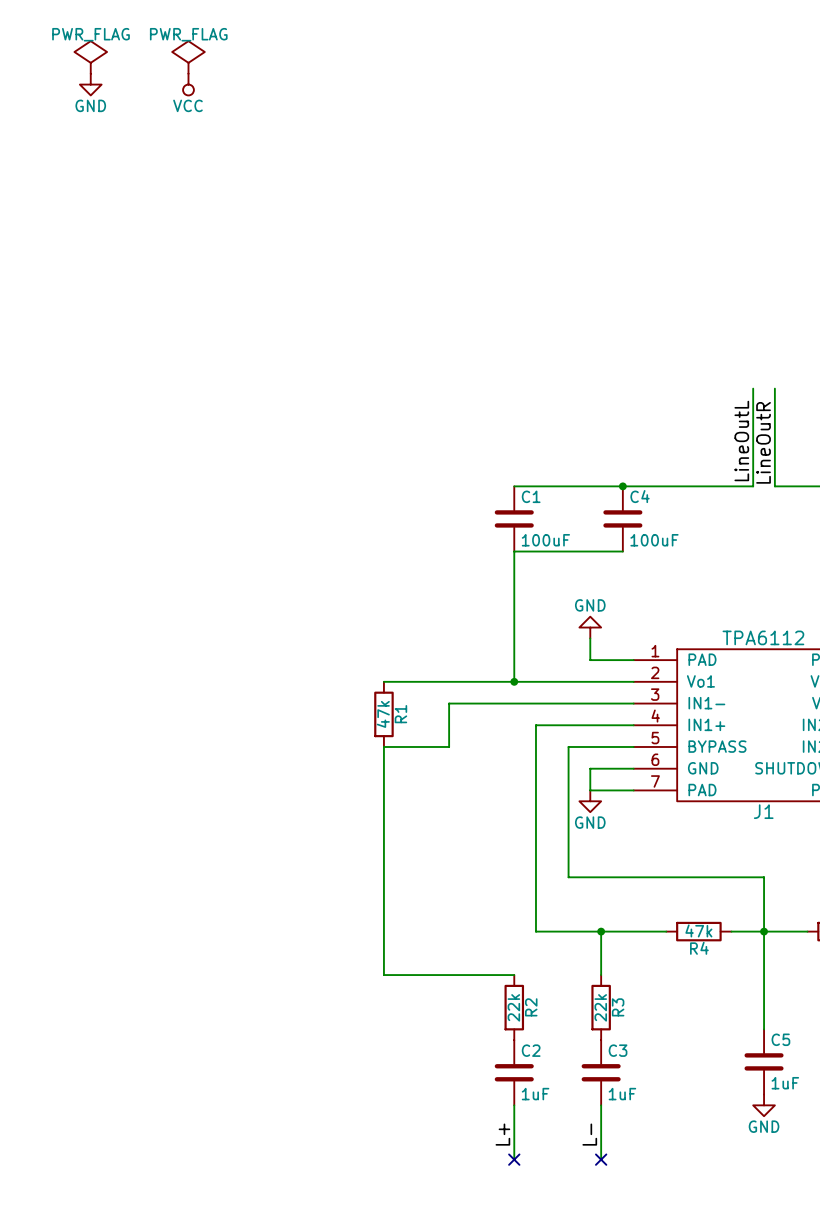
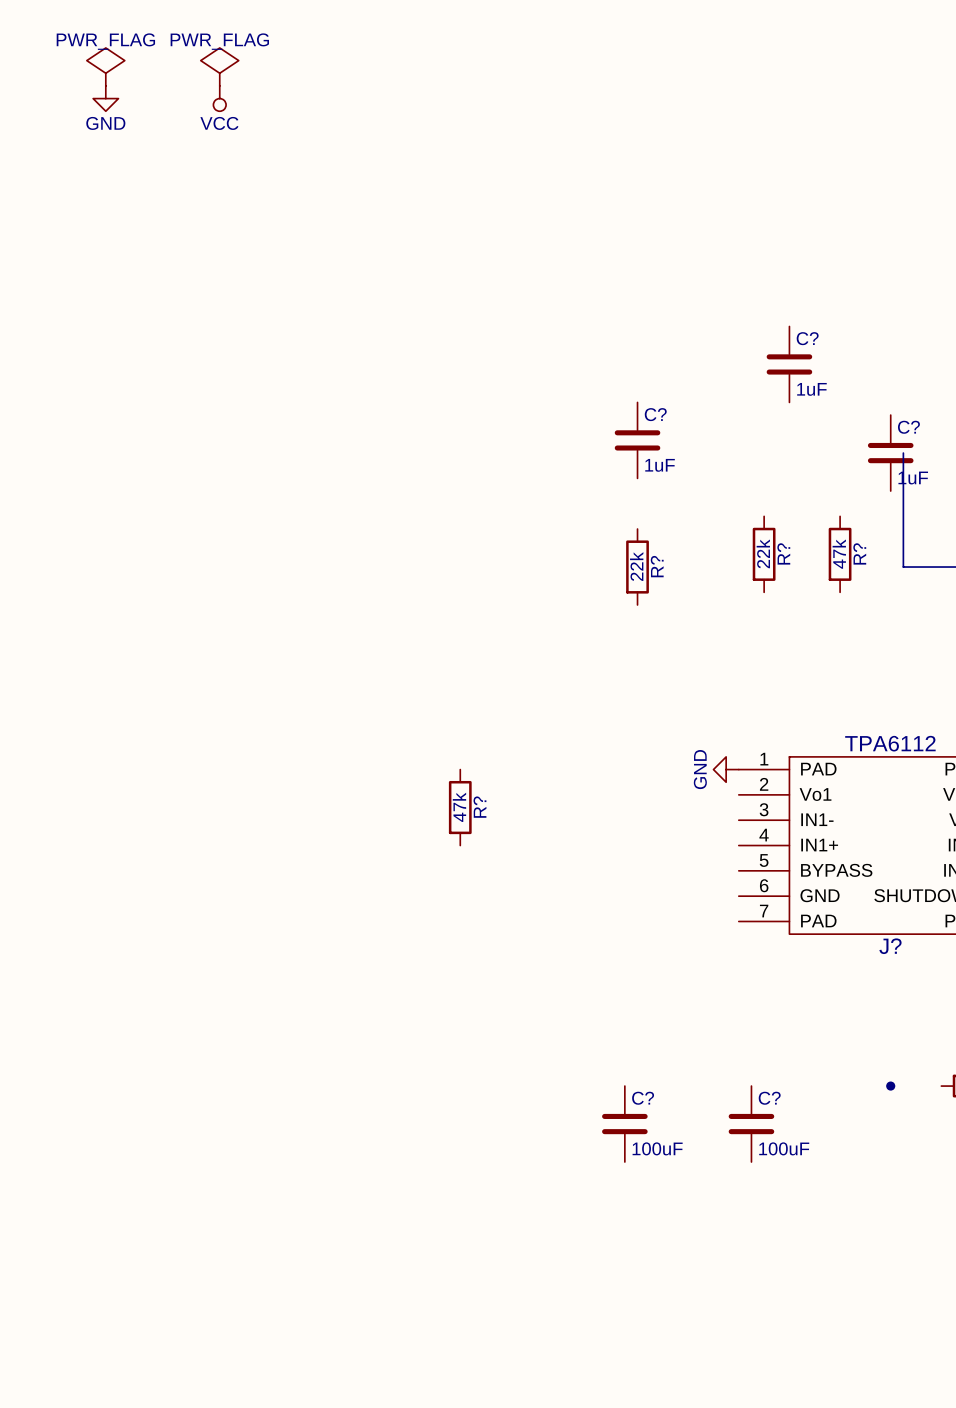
C?: none -> 1uF (789, 364)
C?: none -> 1uF (637, 440)
wire: (753, 388) (753, 486) (514, 486) -> none
C?: none -> 1uF (890, 453)
label: LineOutL (741, 440) -> none
label: LineOutR (763, 442) -> none
R?: none -> 22k (764, 554)
R?: none -> 47k (840, 554)
R?: none -> 22k (637, 567)
junction: (622, 486) -> none
C1: 100uF (514, 518) -> none
C4: 100uF (622, 518) -> none
wire: (622, 551) (514, 551) (514, 681) -> none
power symbol rotation: 0° (590, 627) -> 90° counterclockwise (726, 769)
power symbol position: GND (590, 627) -> GND (726, 769)
wire: (590, 638) (590, 660) (633, 660) -> none
wire: (383, 681) (633, 681) -> none
junction: (514, 681) -> none
R?: none -> 47k (460, 807)
wire: (633, 703) (449, 703) (449, 746) (383, 746) (383, 975) (514, 975) -> none
R1: 47k (383, 714) -> none
wire: (633, 725) (535, 725) (535, 931) (666, 931) -> none
wire: (633, 746) (568, 746) (568, 877) (764, 877) (764, 1029) -> none
wire: (633, 768) (590, 768) (590, 790) (633, 790) -> none
power symbol: GND (590, 801) -> none
J1 name: J1 (763, 811) -> J? (890, 946)
wire: (601, 931) (601, 975) -> none
junction: (601, 931) -> none
R4: 47k (698, 931) -> none
wire: (731, 931) (807, 931) -> none
C?: none -> 100uF (624, 1124)
C?: none -> 100uF (751, 1124)
R2: 22k (514, 1007) -> none
R3: 22k (601, 1007) -> none
C5: 1uF (764, 1061) -> none
C2: 1uF (514, 1072) -> none
C3: 1uF (601, 1072) -> none
wire: (514, 1105) (514, 1159) -> none
wire: (601, 1105) (601, 1159) -> none
power symbol: GND (764, 1105) -> none
label: L+ (502, 1134) -> none
label: L- (589, 1134) -> none
no-connect mark: (514, 1159) -> none
no-connect mark: (601, 1159) -> none

